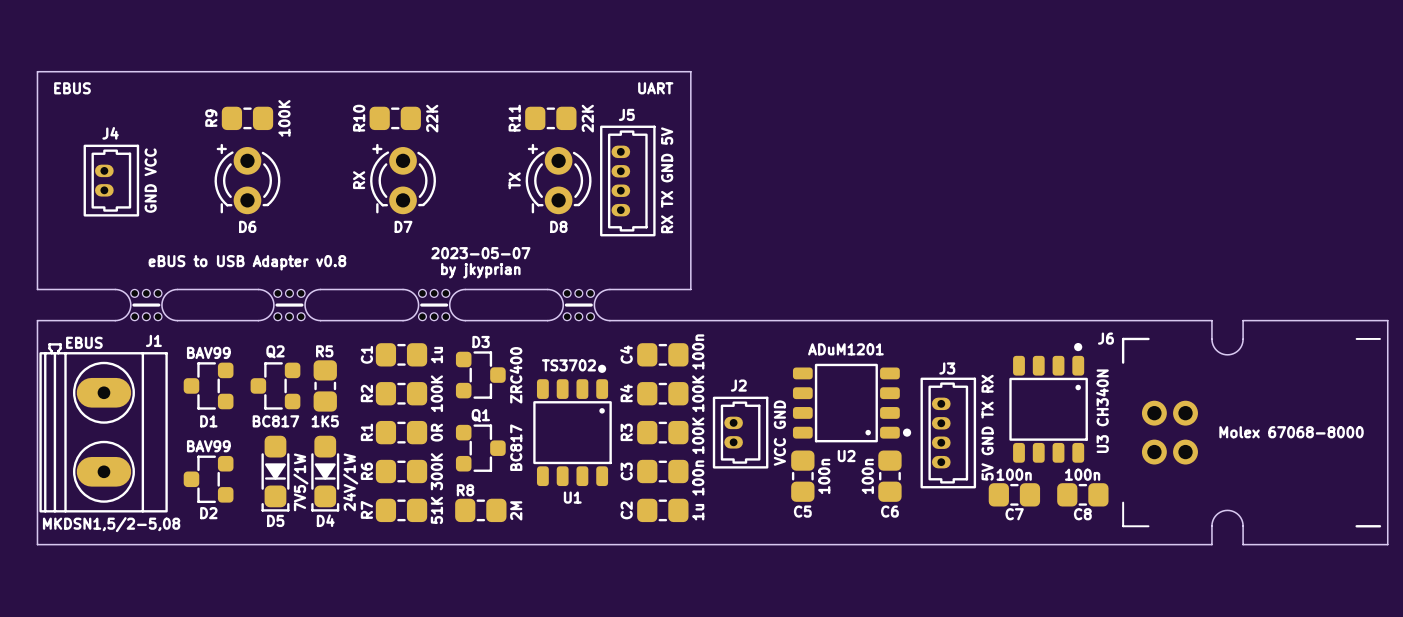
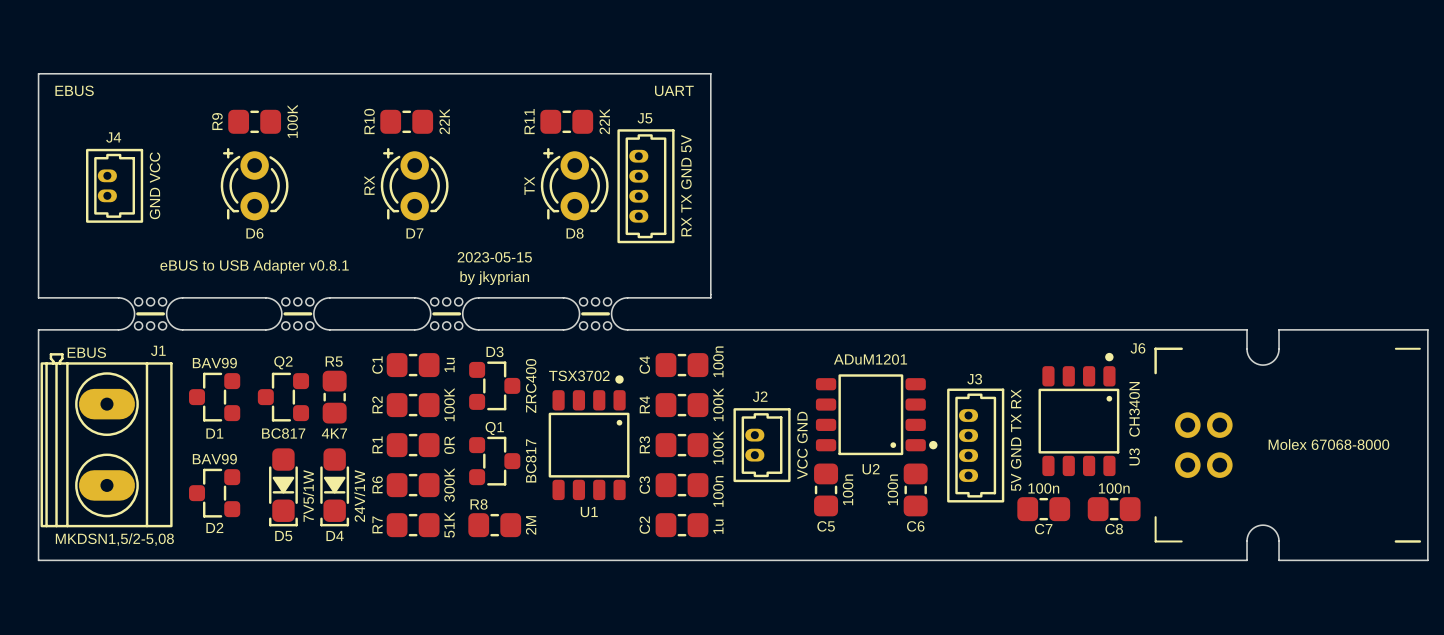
text: 2023-05-07 (480, 253) -> 2023-05-15 (494, 257)
text: eBUS to USB Adapter v0.8 (247, 262) -> eBUS to USB Adapter v0.8.1 (254, 266)
U1 value: TS3702 (568, 365) -> TSX3702 (579, 375)
R5 value: 1K5 (325, 421) -> 4K7 (334, 433)

